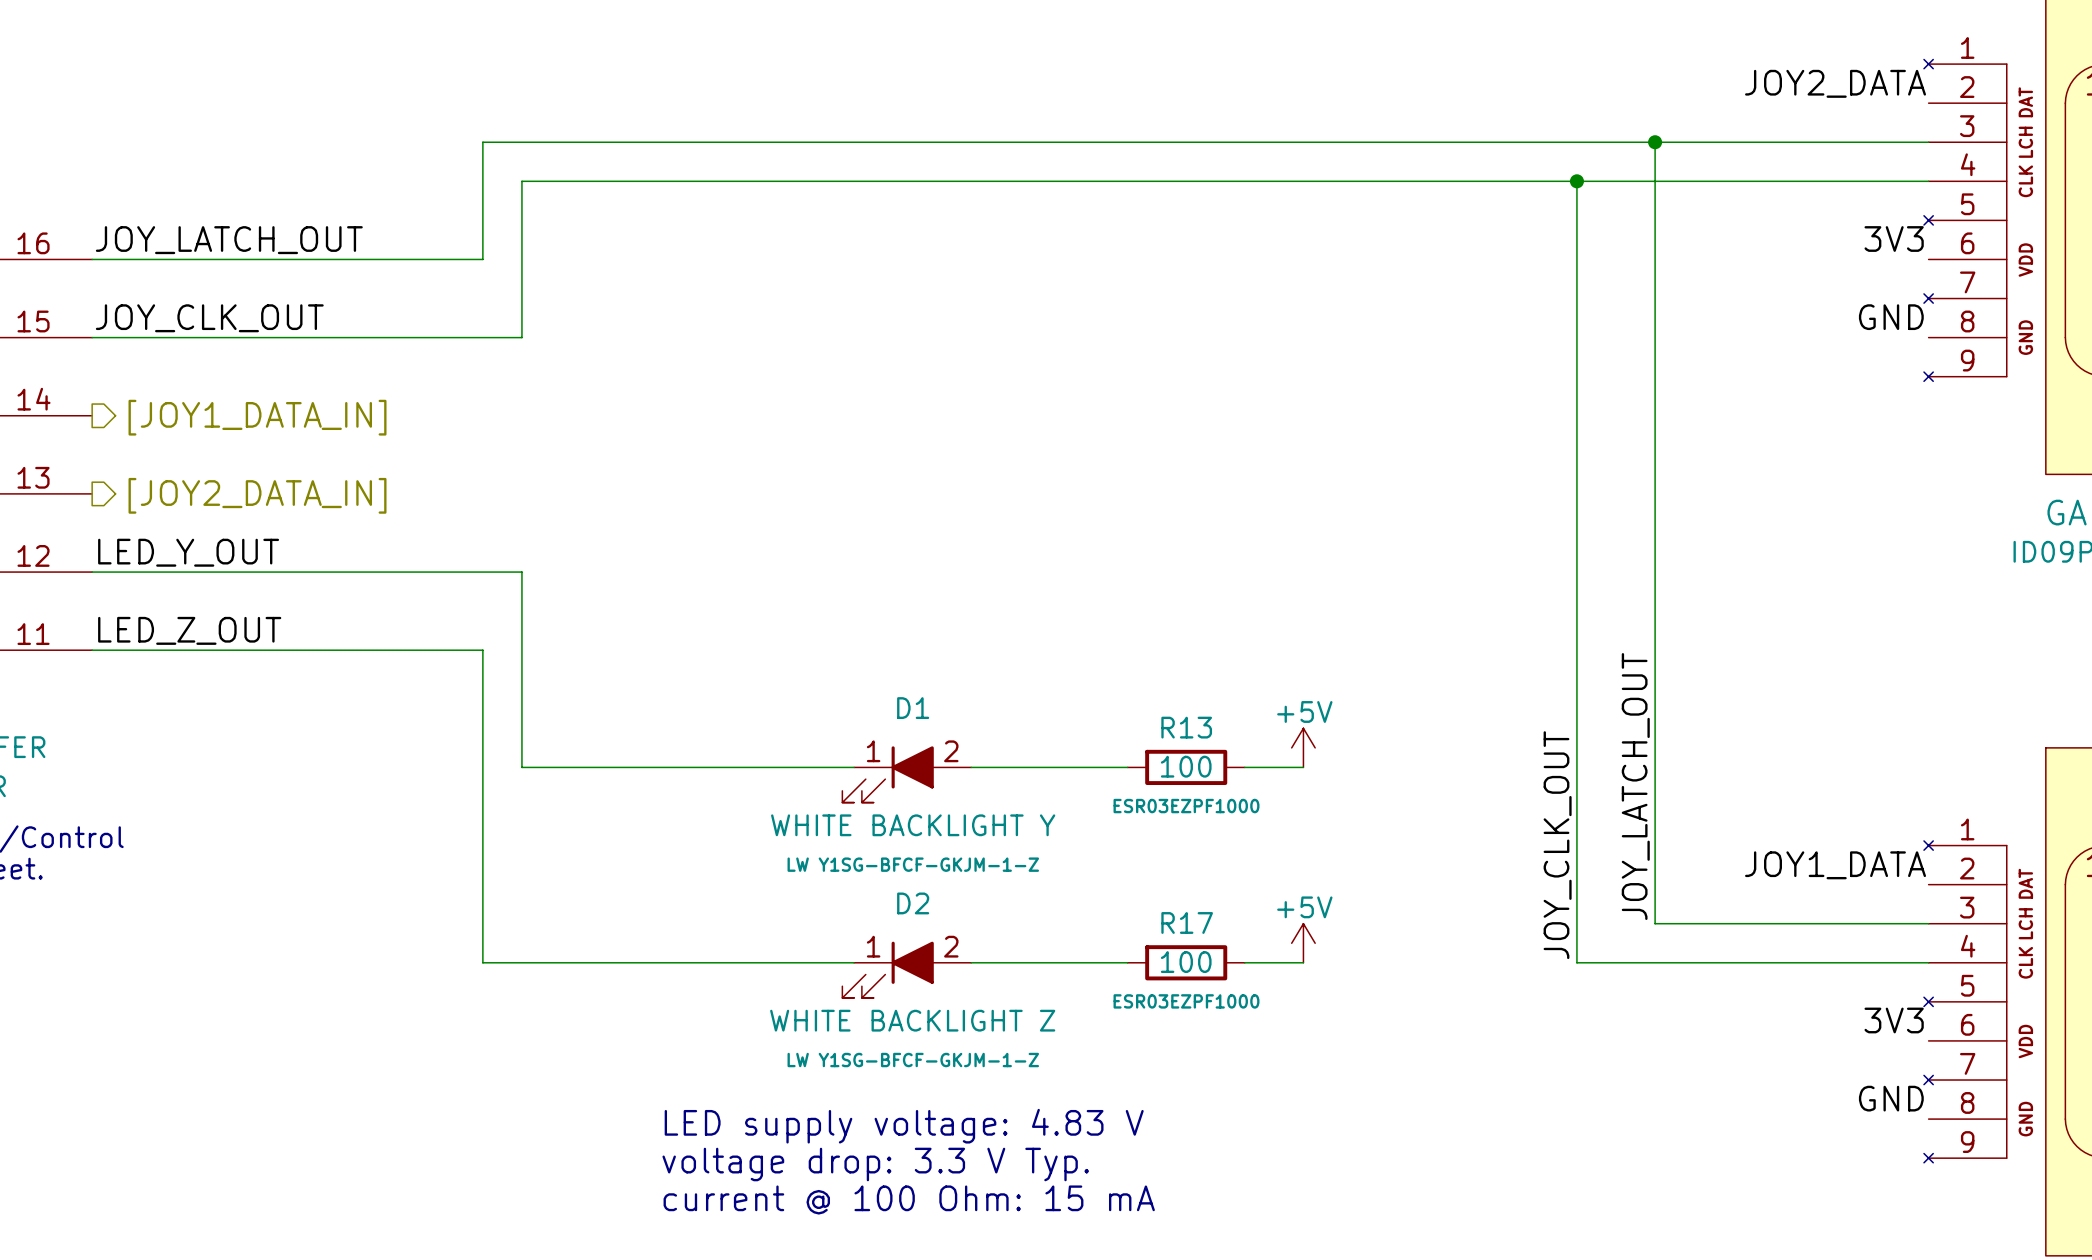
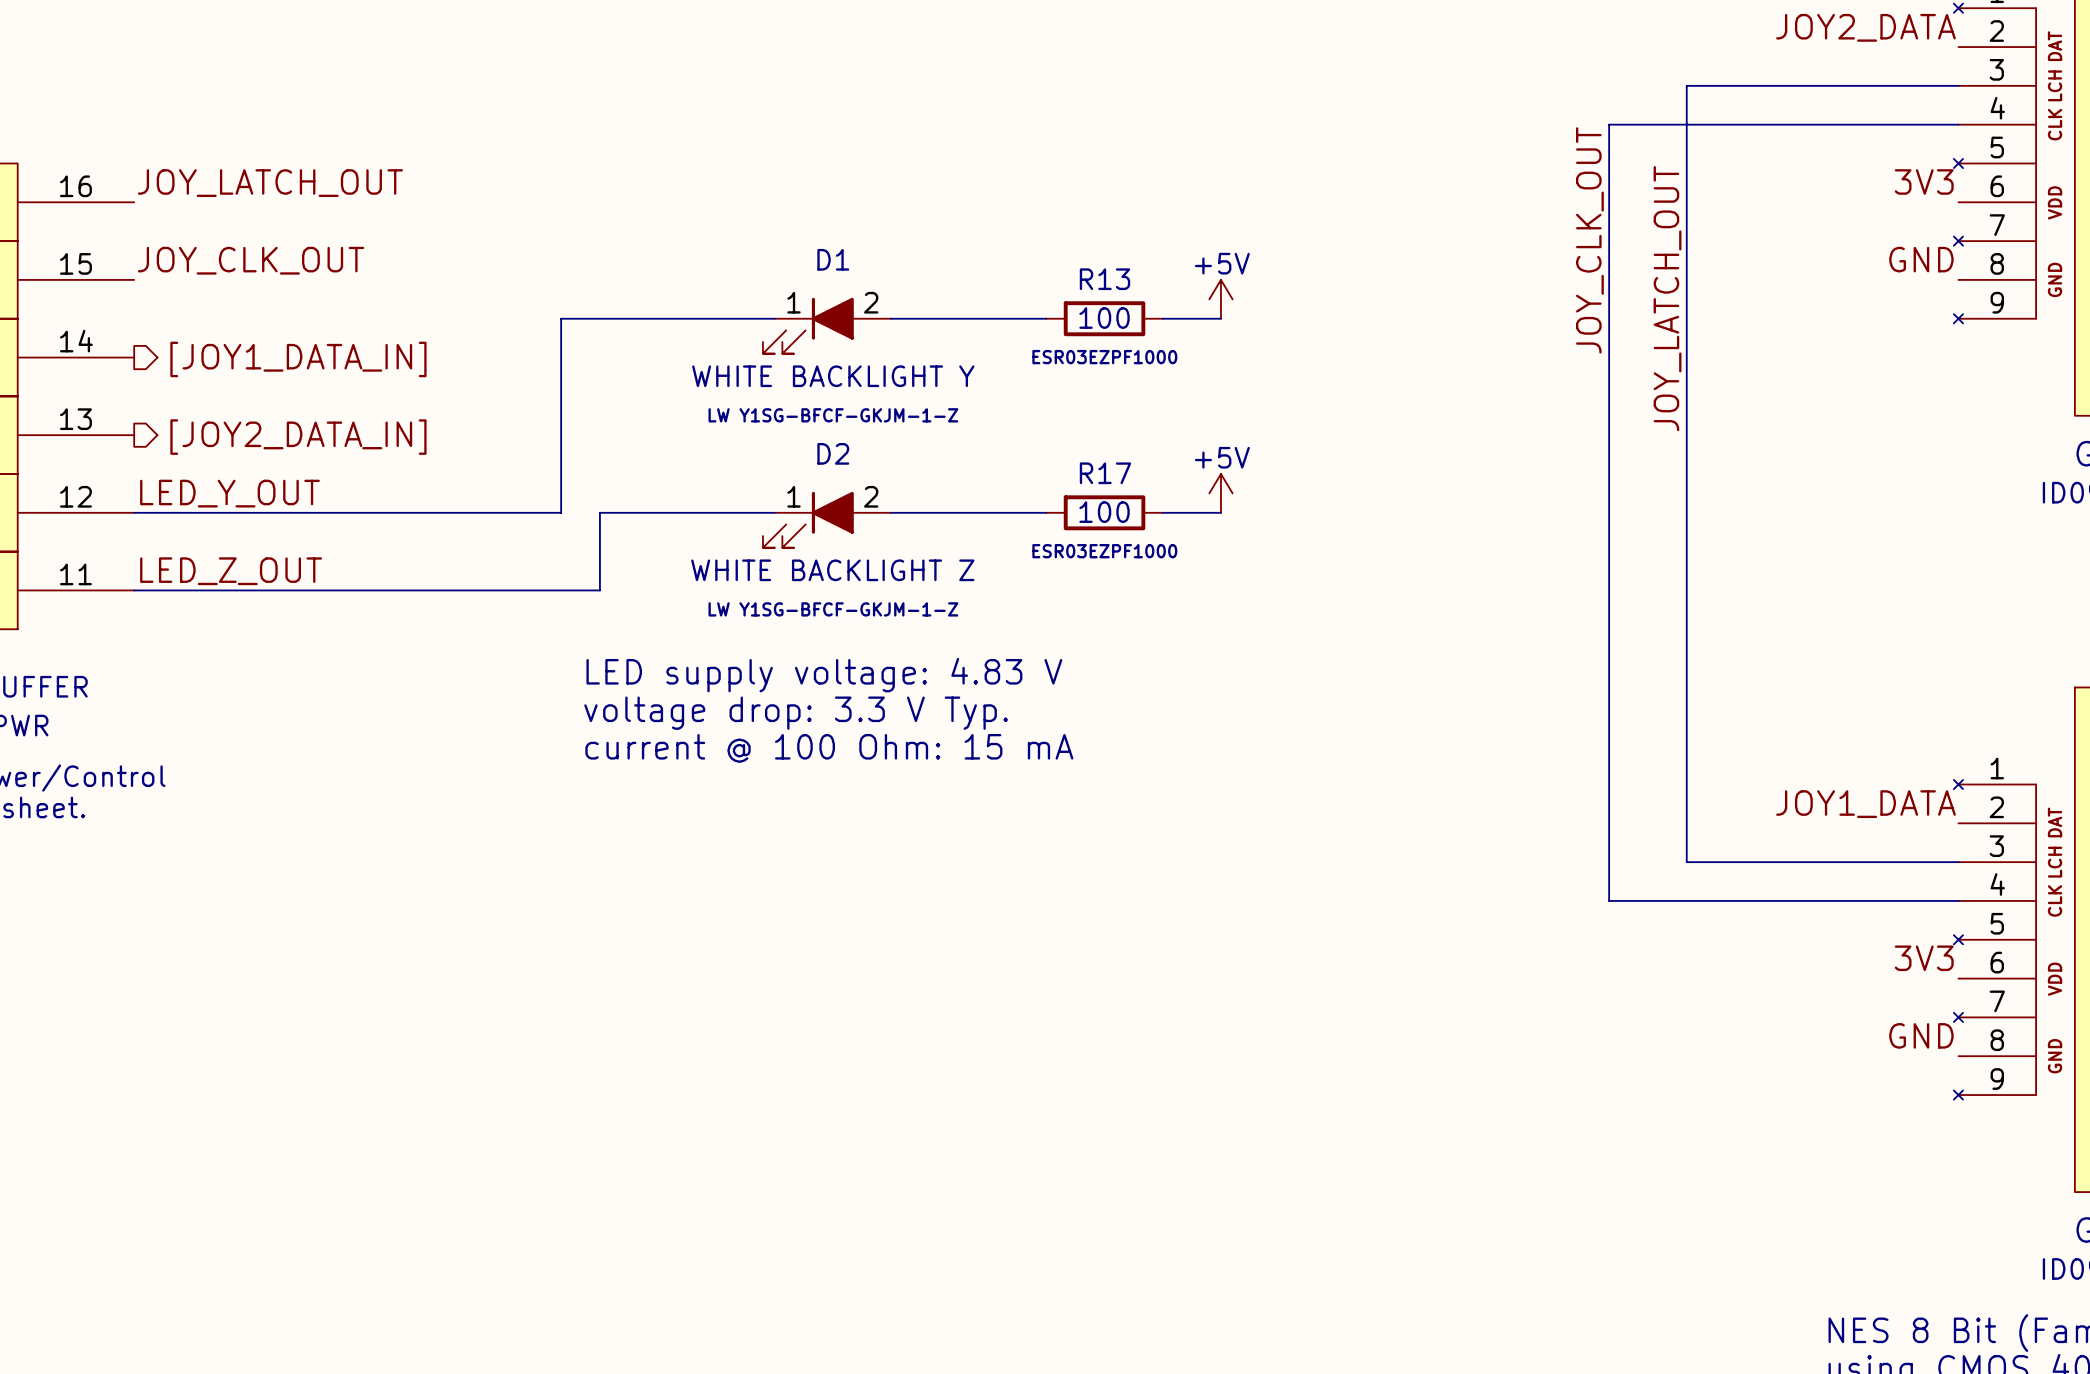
wire: (1655, 142) (482, 142) (482, 259) (92, 259) -> none
junction: (1655, 142) -> none
wire: (1576, 181) (521, 181) (521, 337) (92, 337) -> none
junction: (1576, 181) -> none
label: none -> JOY_CLK_OUT (1589, 240)
label: none -> JOY_LATCH_OUT (1667, 298)
power symbol: none -> +5V (1220, 299)
wire: none -> (891, 318) (1046, 318)
wire: none -> (1162, 318) (1220, 318)
power symbol: none -> +5V (1220, 493)
wire: (521, 572) (521, 767) (854, 767) -> (561, 512) (561, 318) (774, 318)
wire: (482, 650) (482, 962) (854, 962) -> (522, 590) (599, 590) (599, 512) (774, 512)
text: none -> LED supply voltage: 4.83 V (824, 675)
power symbol: +5V (1303, 747) -> none
wire: (971, 767) (1127, 767) -> (891, 512) (1046, 512)
R13 position: (1186, 767) -> (1104, 318)
wire: (1244, 767) (1303, 767) -> (1162, 512) (1220, 512)
text: none -> voltage drop: 3.3 V Typ. (796, 713)
D1 position: (906, 774) -> (827, 325)
label: JOY_LATCH_OUT (1635, 786) -> none
text: none -> current @ 100 Ohm: 15 mA (829, 748)
label: JOY_CLK_OUT (1557, 845) -> none
power symbol: +5V (1303, 943) -> none
wire: (971, 962) (1127, 962) -> none
R17 position: (1186, 962) -> (1104, 512)
wire: (1244, 962) (1303, 962) -> none
D2 position: (906, 969) -> (827, 519)
text: LED supply voltage: 4.83 V (904, 1126) -> none
text: voltage drop: 3.3 V Typ. (875, 1164) -> none
text: current @ 100 Ohm: 15 mA (909, 1200) -> none

